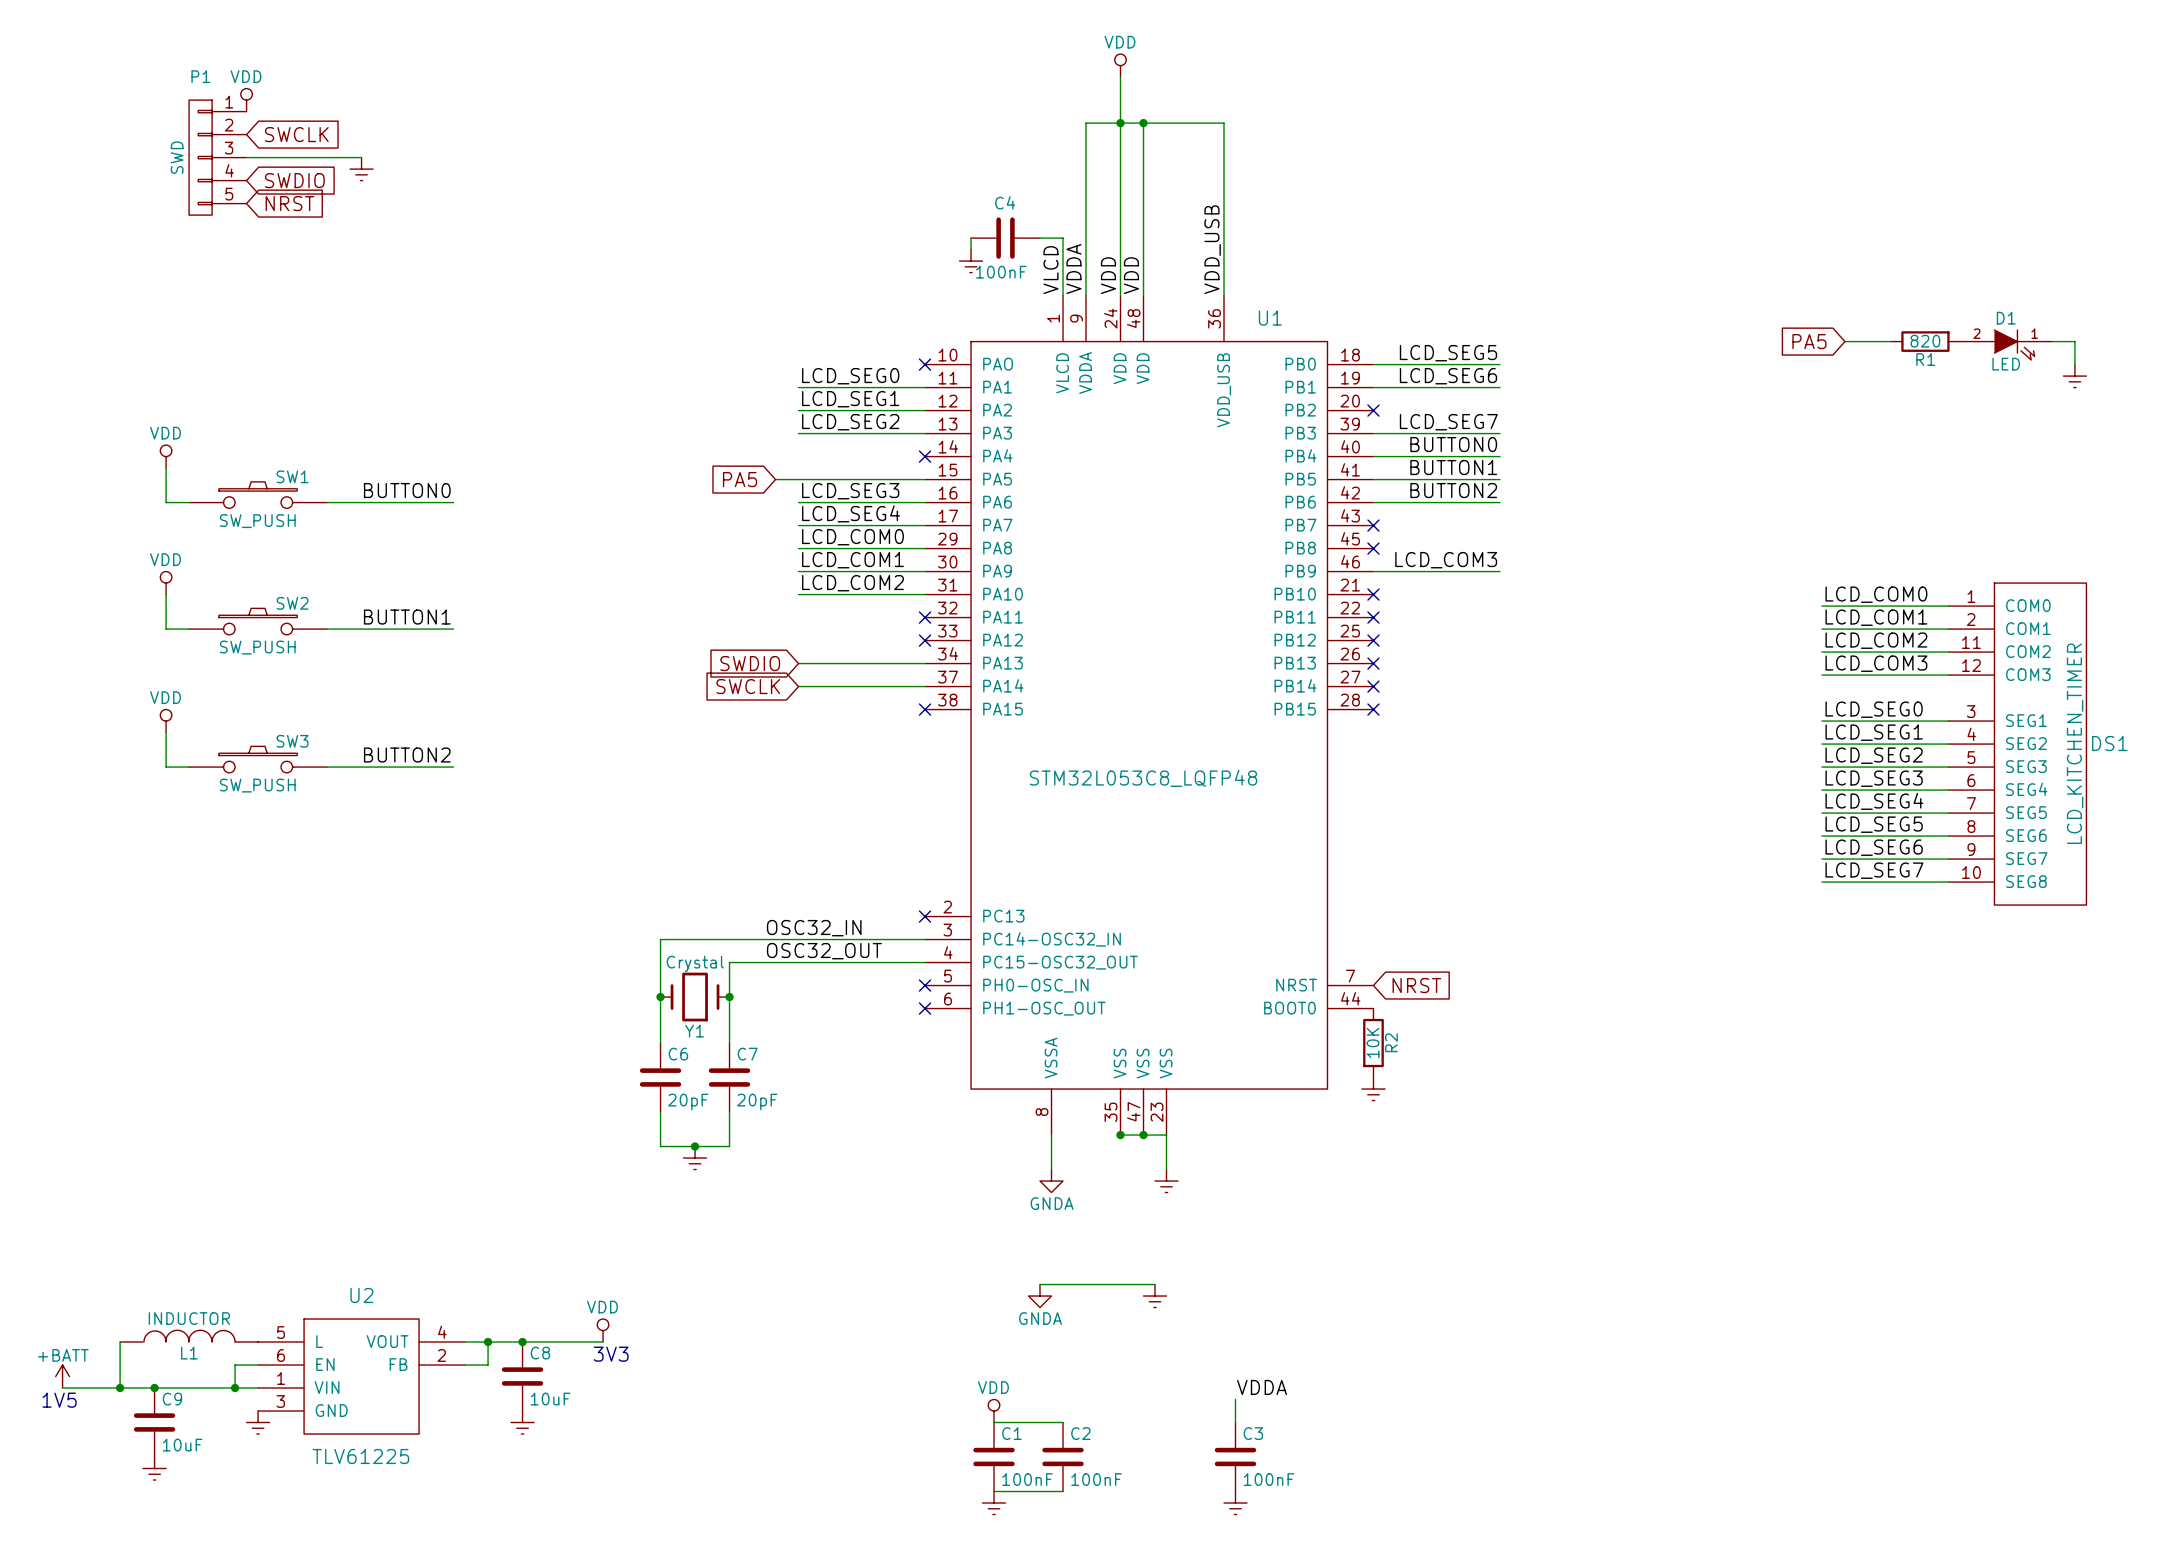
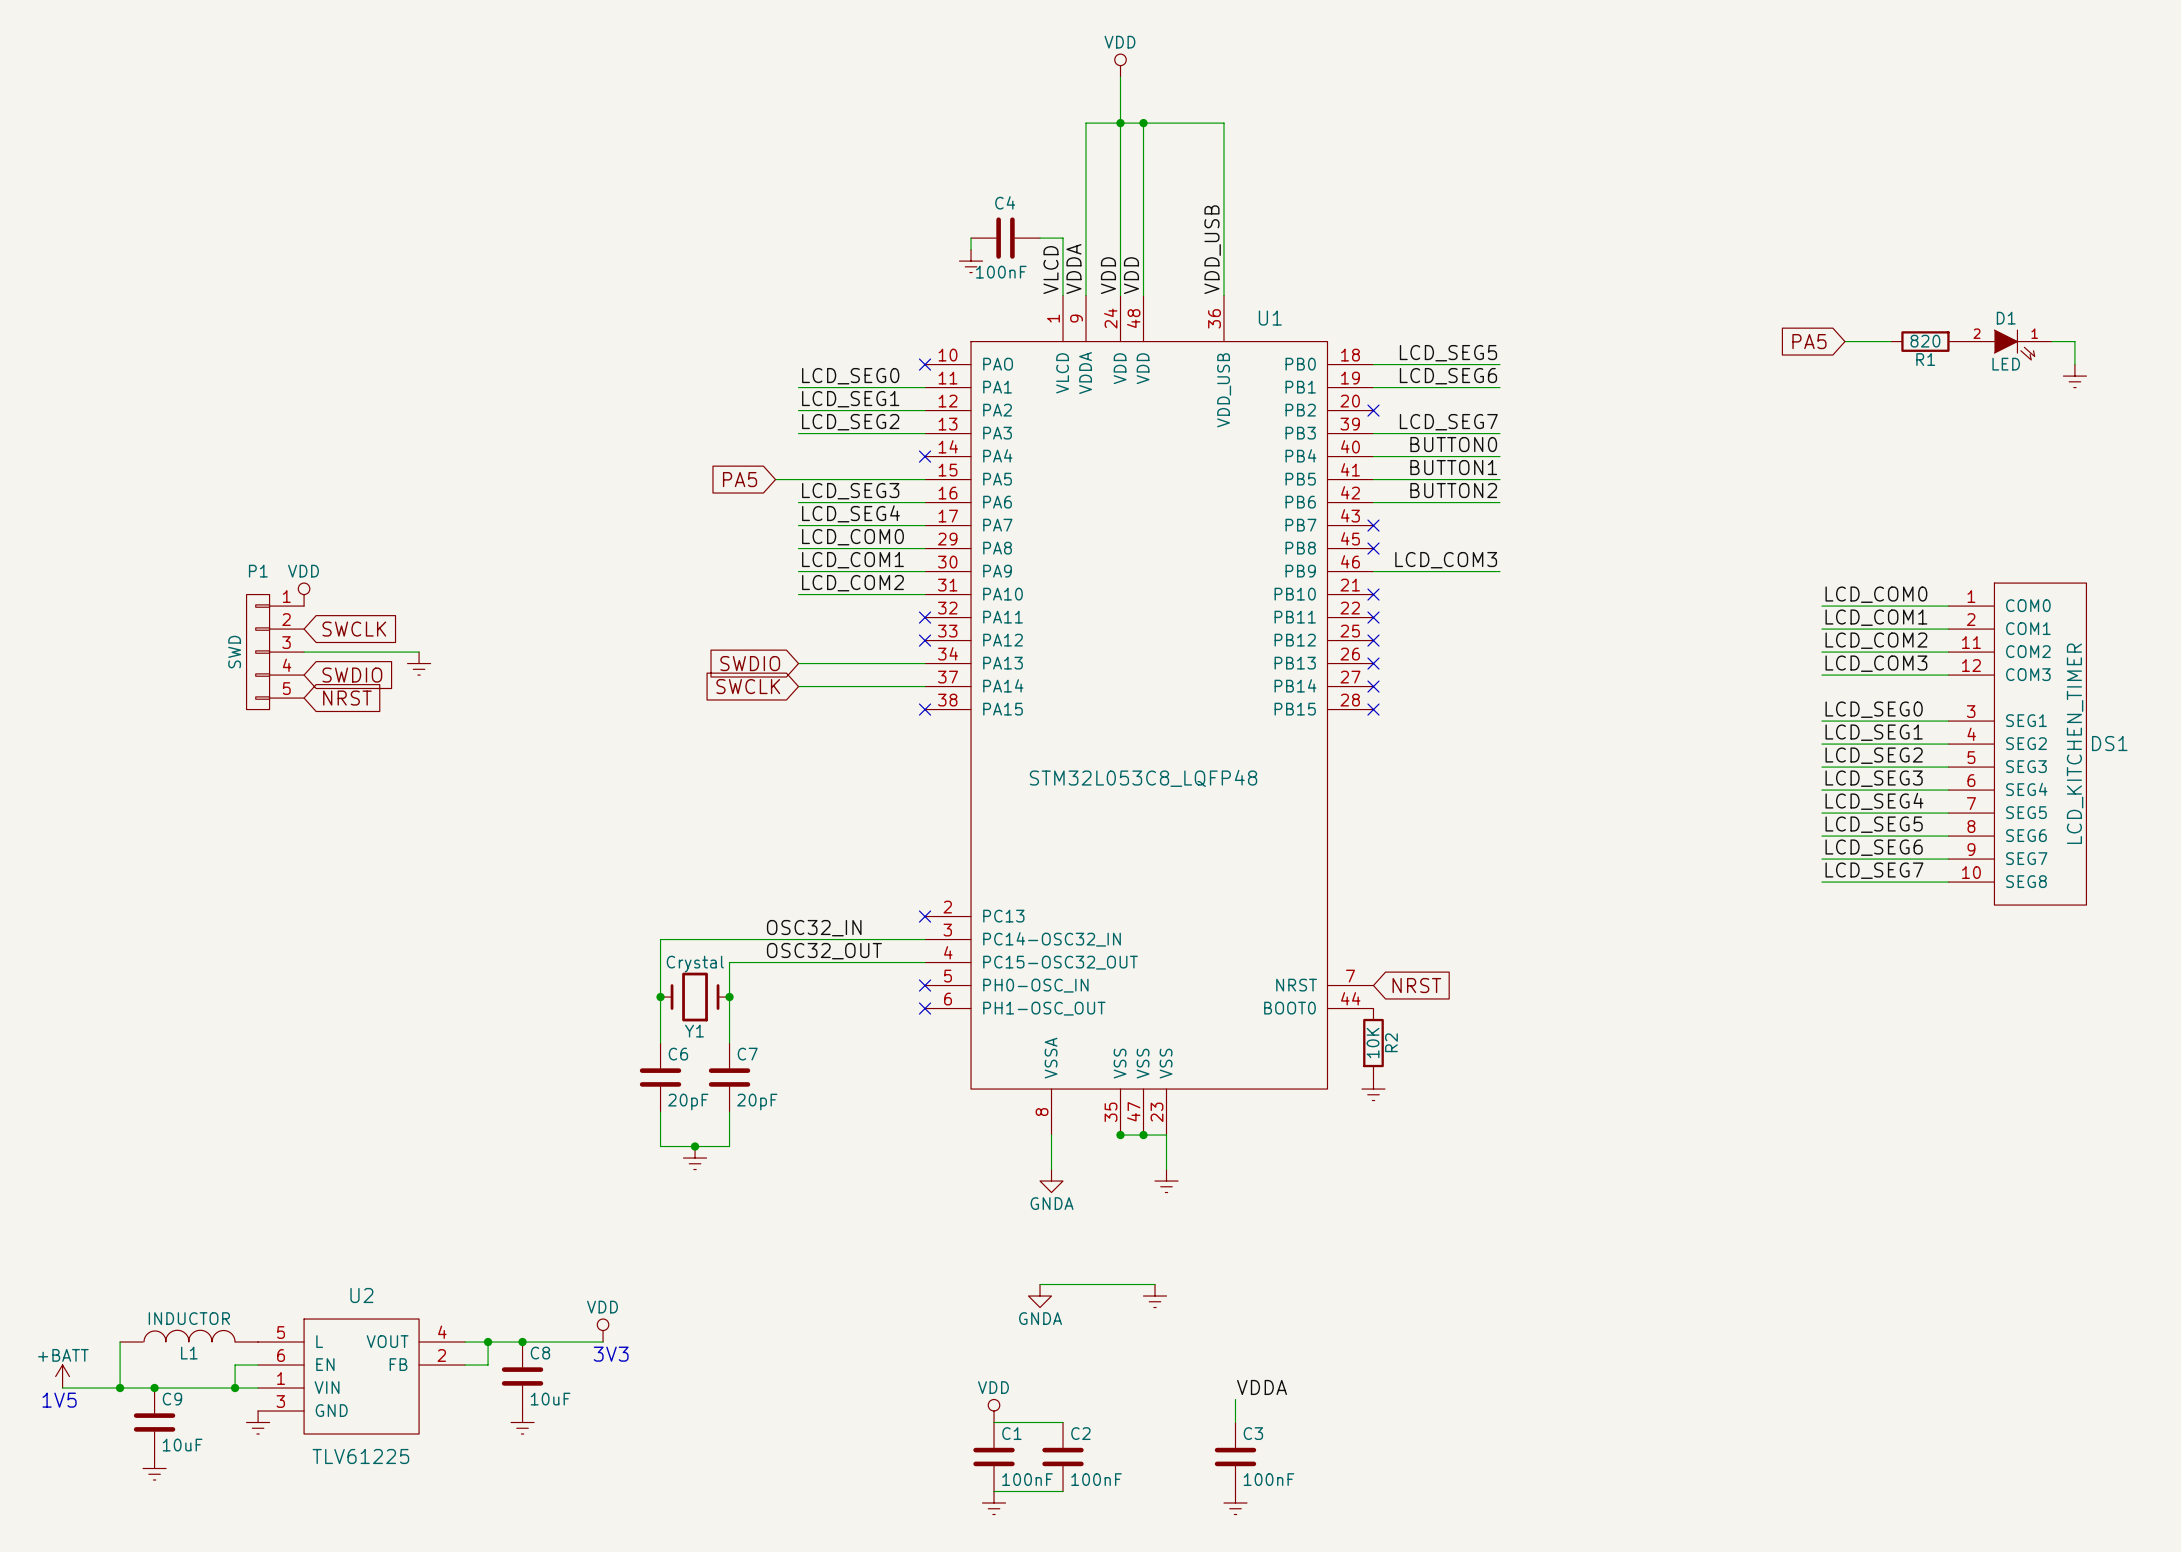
power symbol: VDD (246, 100) -> none
global label: SWCLK (296, 134) -> none
P1 position: (217, 157) -> (275, 652)
wire: (246, 157) (361, 157) -> none
power symbol: (361, 169) -> none
global label: SWDIO (294, 180) -> none
global label: NRST (289, 203) -> none
power symbol: VDD (166, 456) -> none
wire: (166, 468) (166, 502) (189, 502) -> none
label: BUTTON0 (407, 490) -> none
SW1: SW_PUSH (258, 495) -> none
wire: (327, 502) (453, 502) -> none
power symbol: VDD (166, 583) -> none
wire: (166, 594) (166, 629) (189, 629) -> none
power symbol: none -> VDD (304, 594)
label: BUTTON1 (407, 617) -> none
SW2: SW_PUSH (258, 621) -> none
wire: (327, 629) (453, 629) -> none
global label: none -> SWCLK (354, 629)
wire: none -> (304, 652) (419, 652)
power symbol: none -> (419, 663)
global label: none -> SWDIO (352, 675)
global label: none -> NRST (347, 698)
power symbol: VDD (166, 721) -> none
wire: (166, 732) (166, 767) (189, 767) -> none
label: BUTTON2 (407, 755) -> none
SW3: SW_PUSH (258, 759) -> none
wire: (327, 767) (453, 767) -> none

